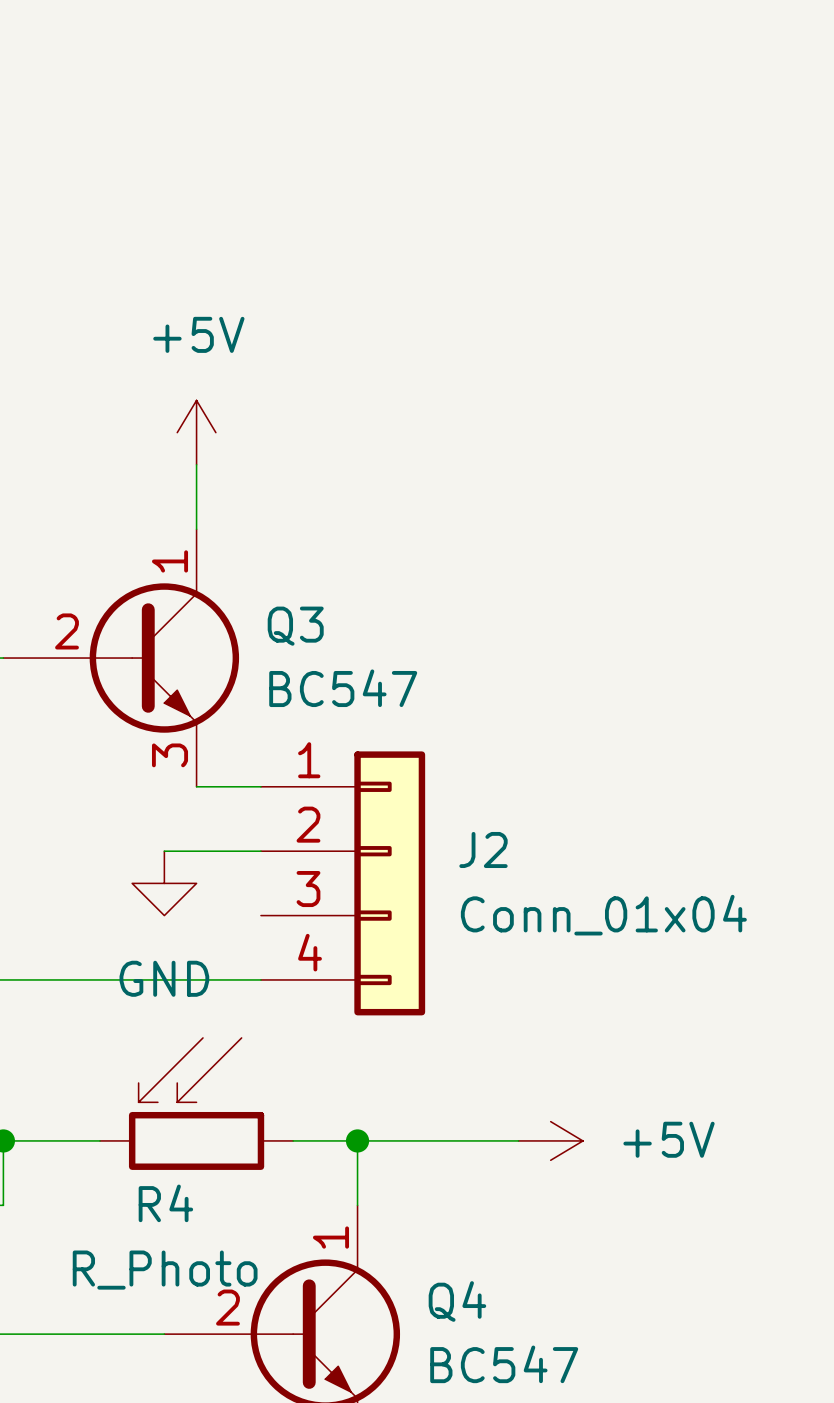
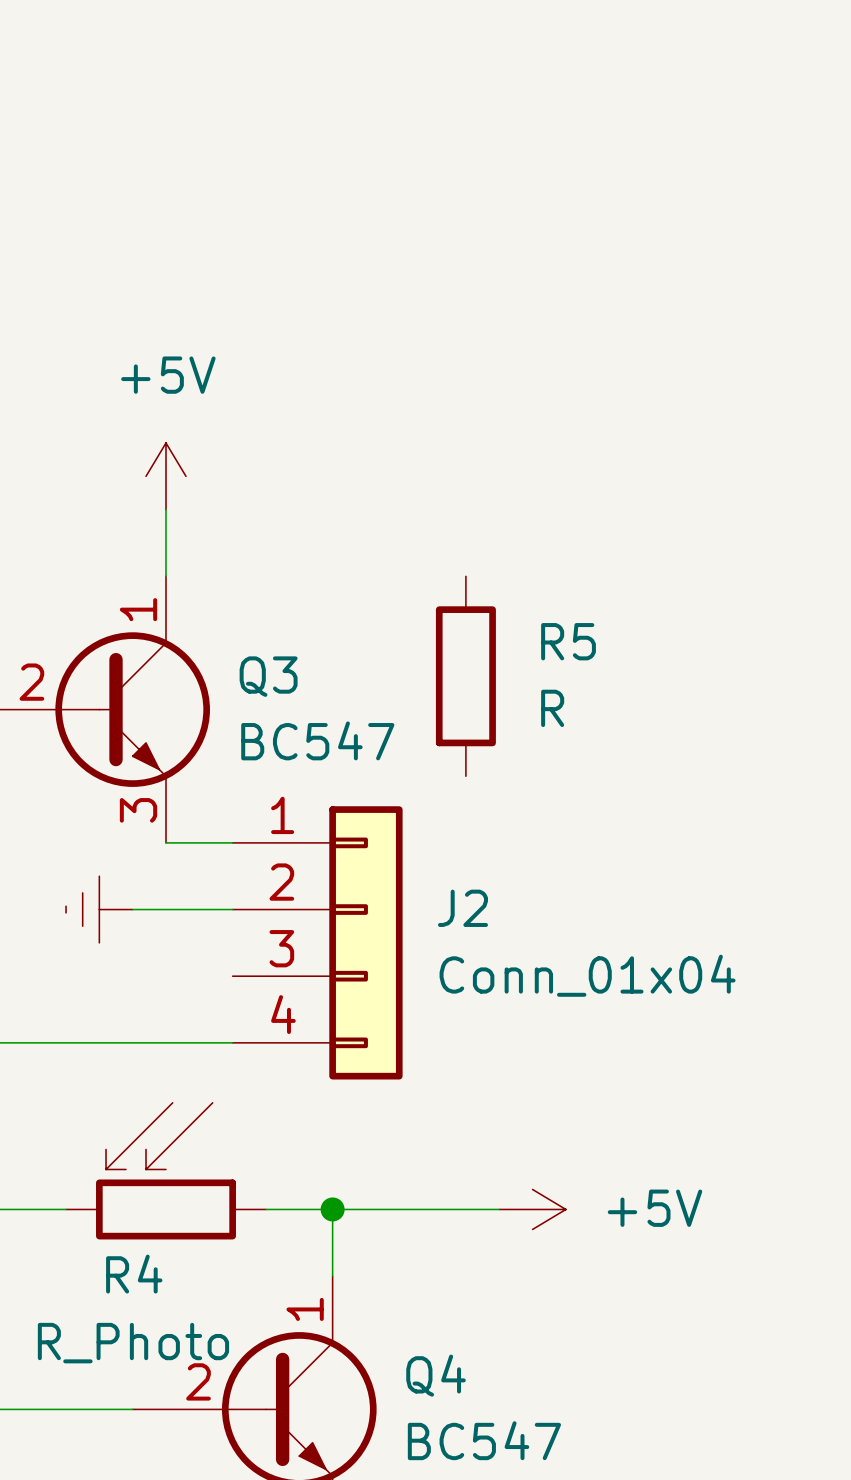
R5: none -> R (465, 676)
power symbol: none -> (99, 909)
power symbol: GND (164, 883) -> none

